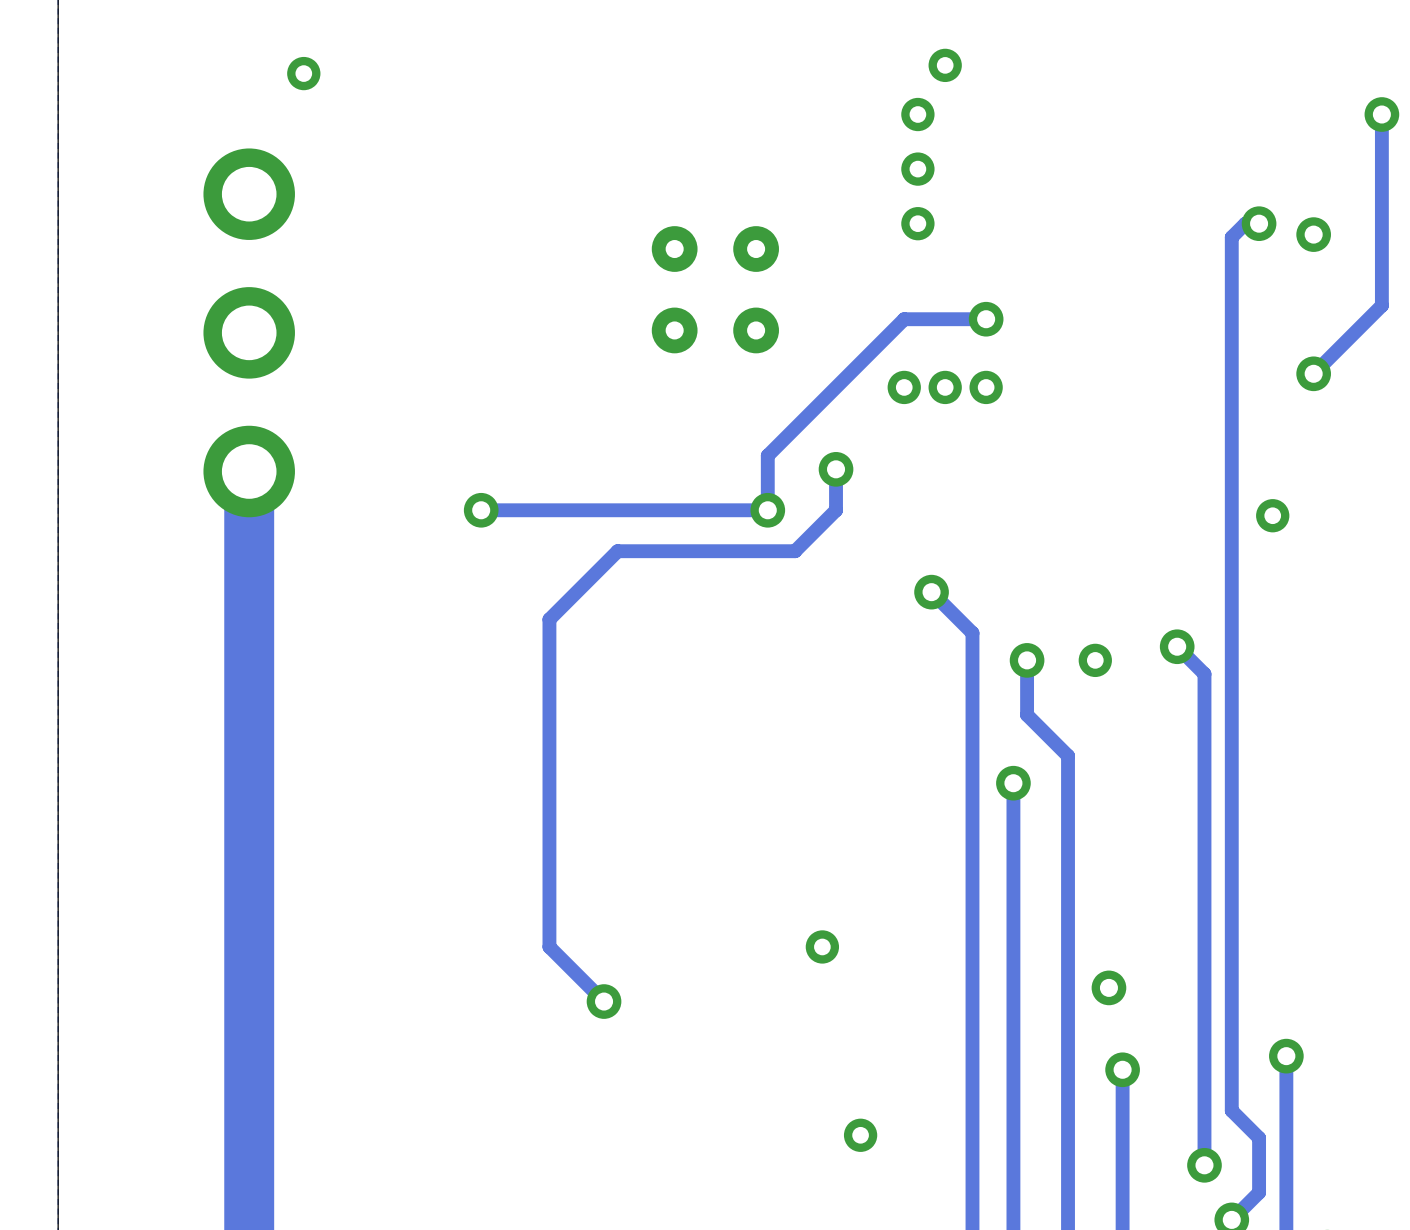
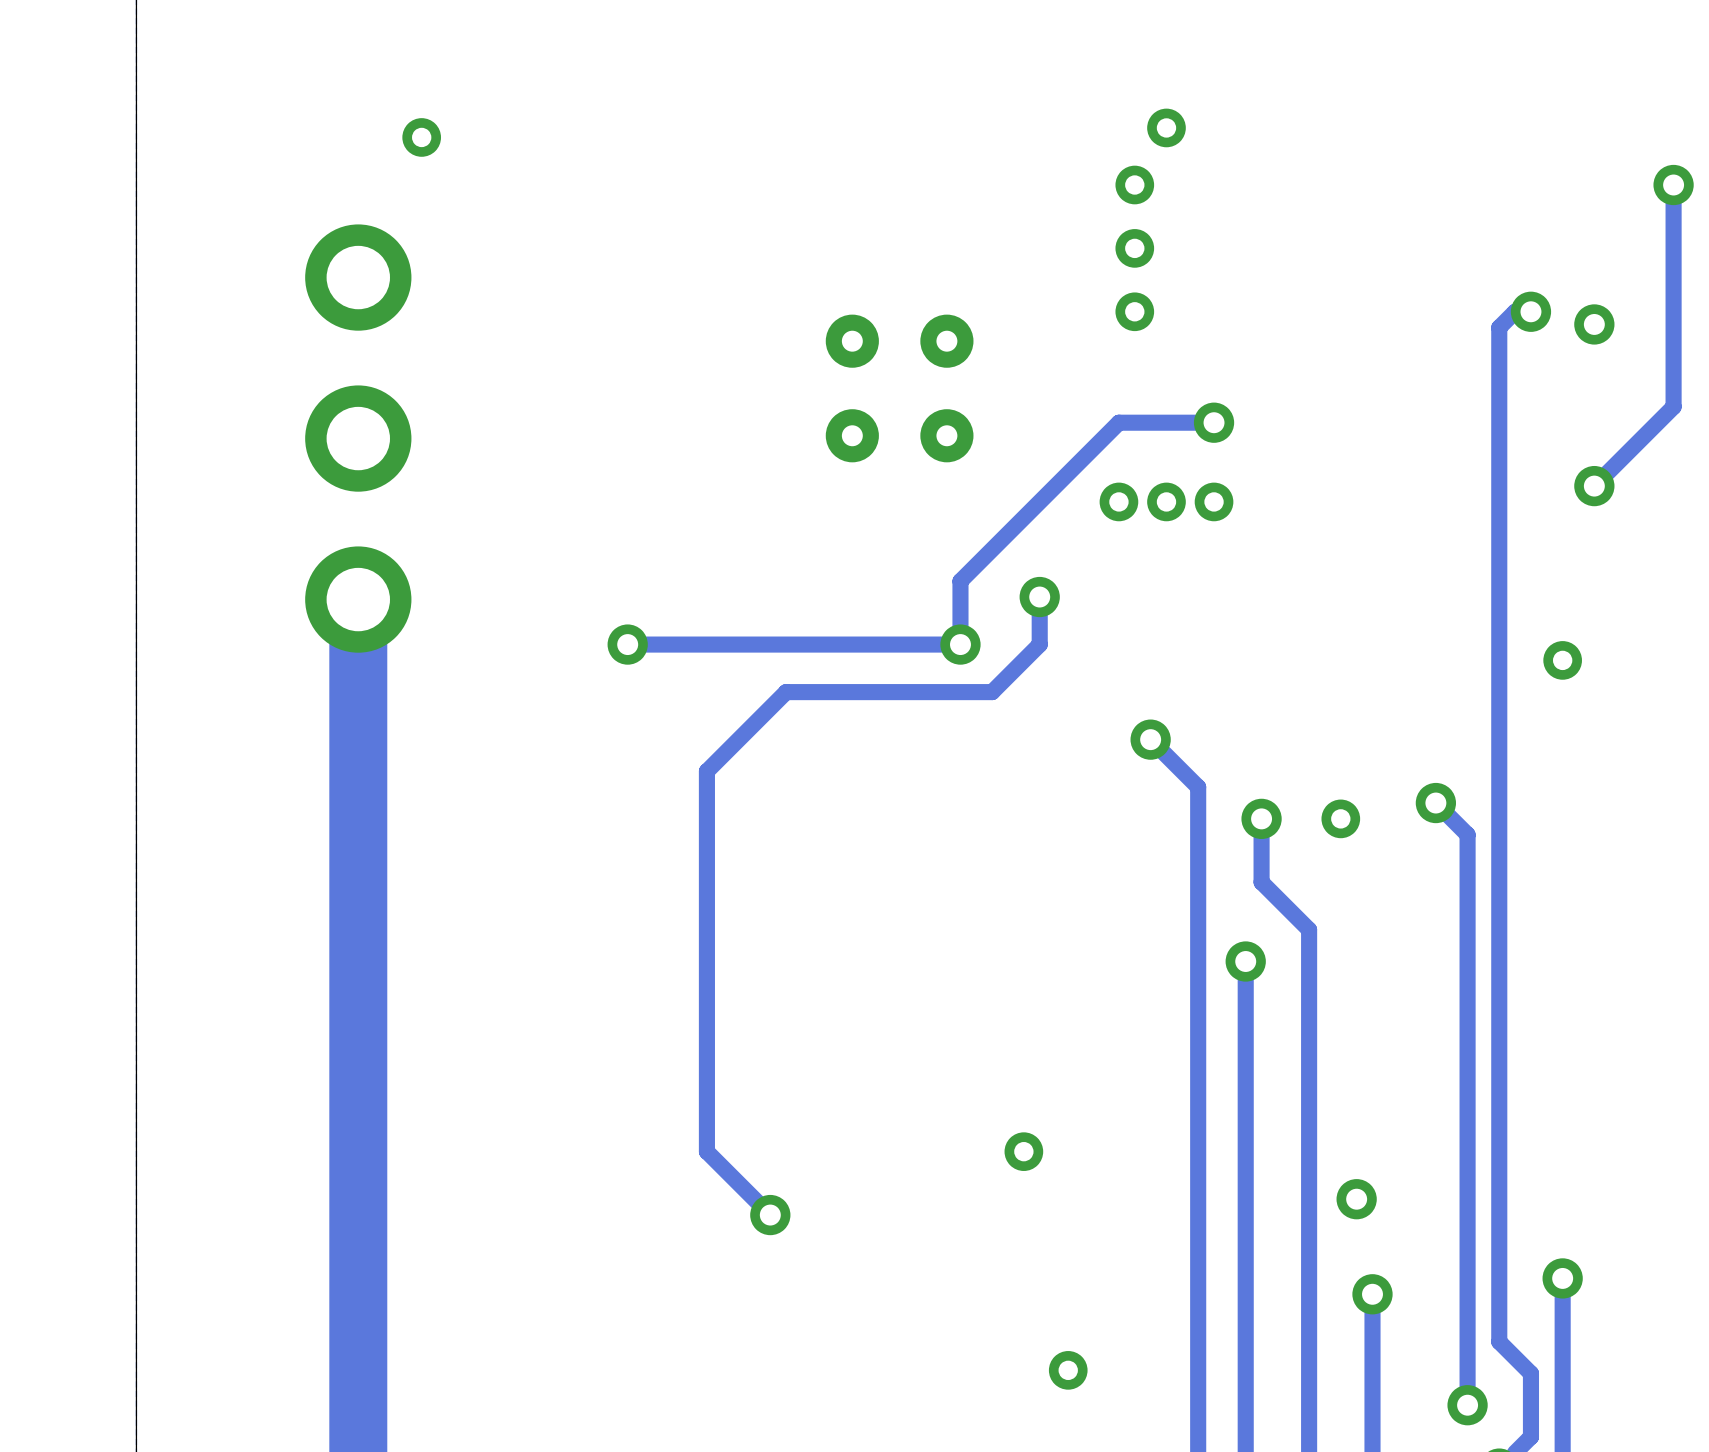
via position: (1272, 515) -> (1562, 660)

